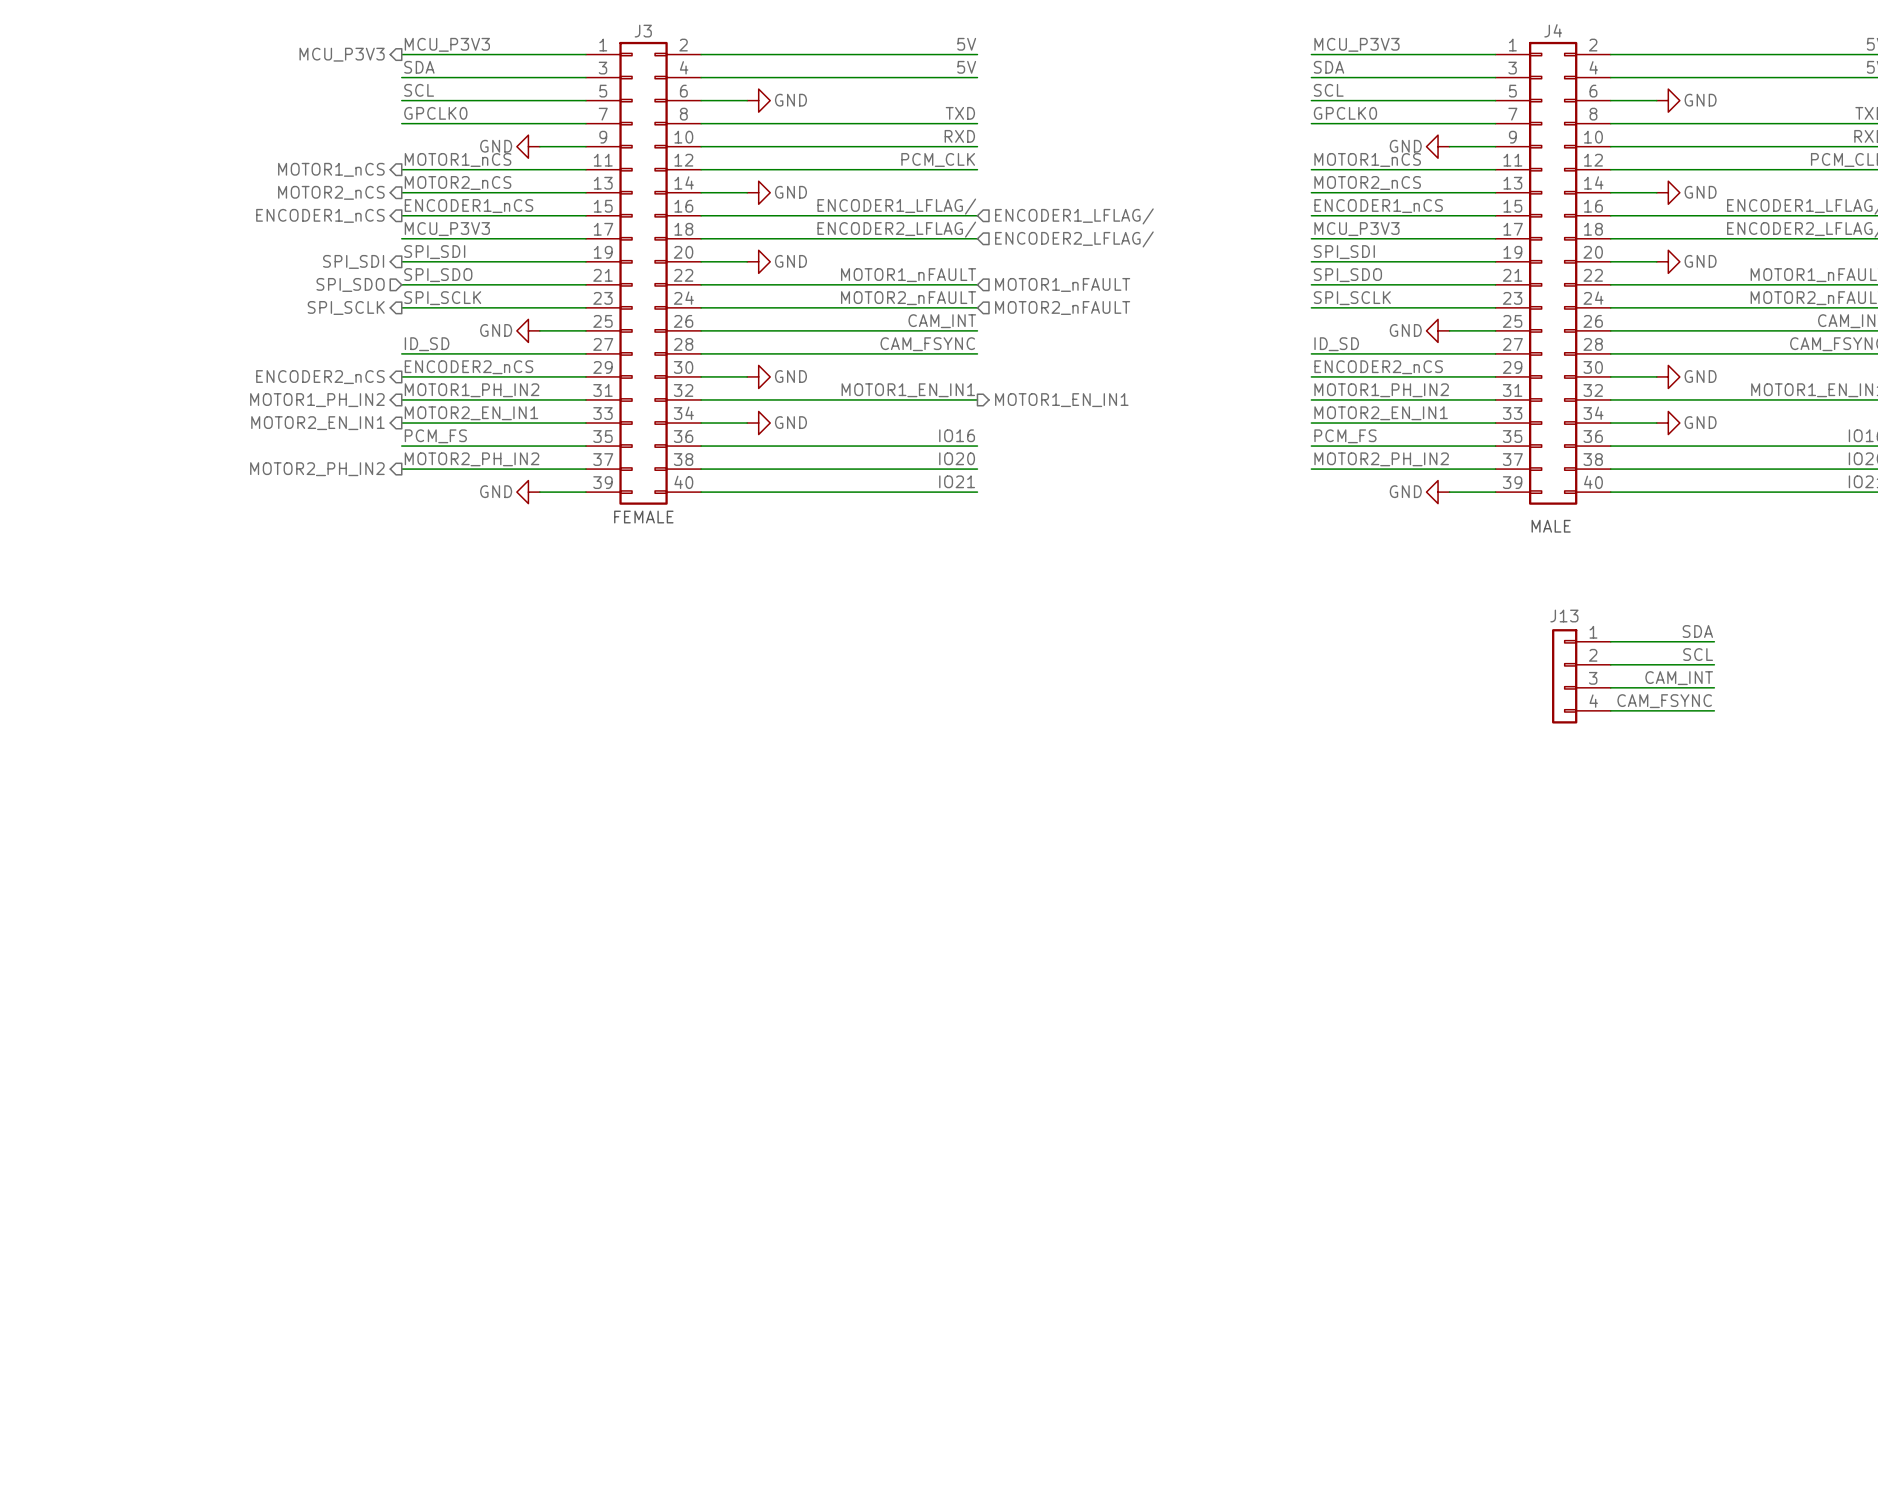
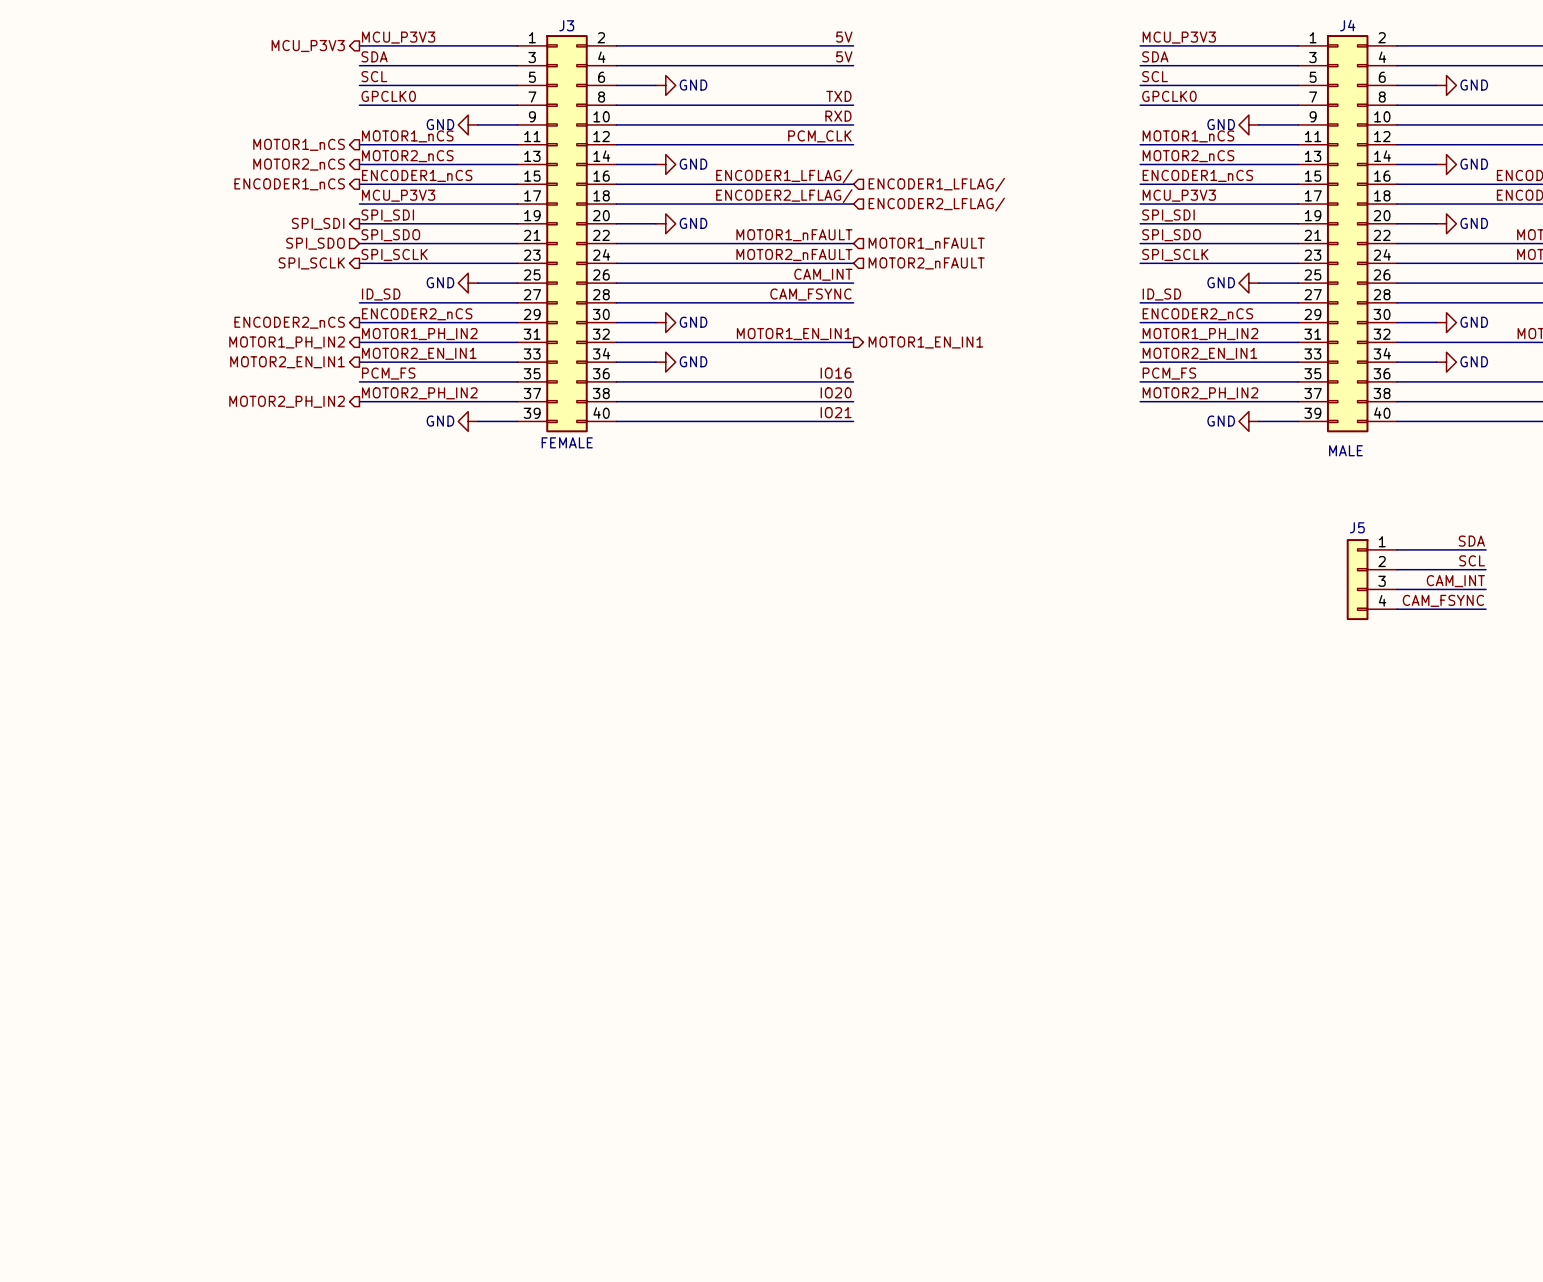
J13 name: J13 (1564, 616) -> J5 (1357, 527)

